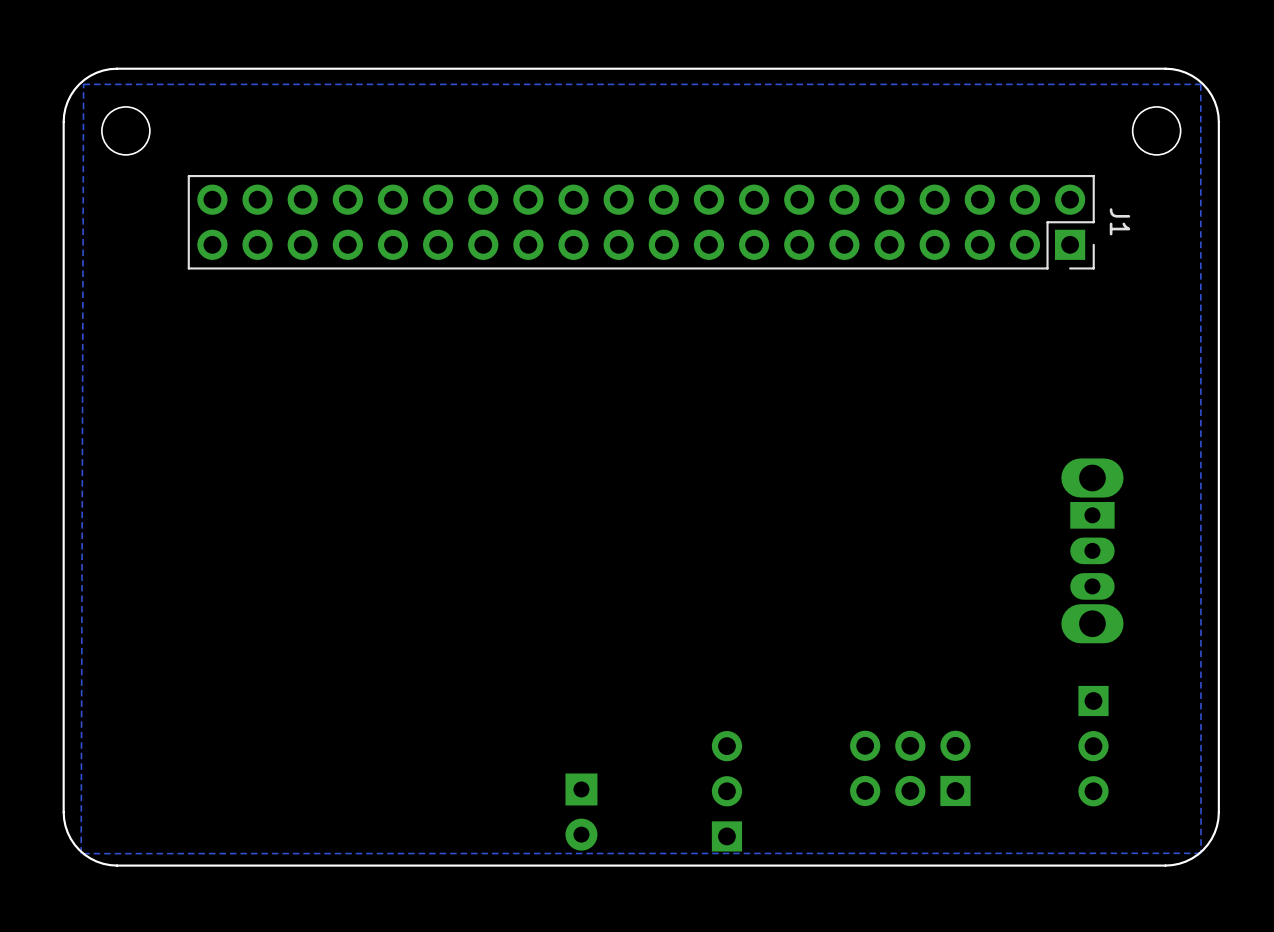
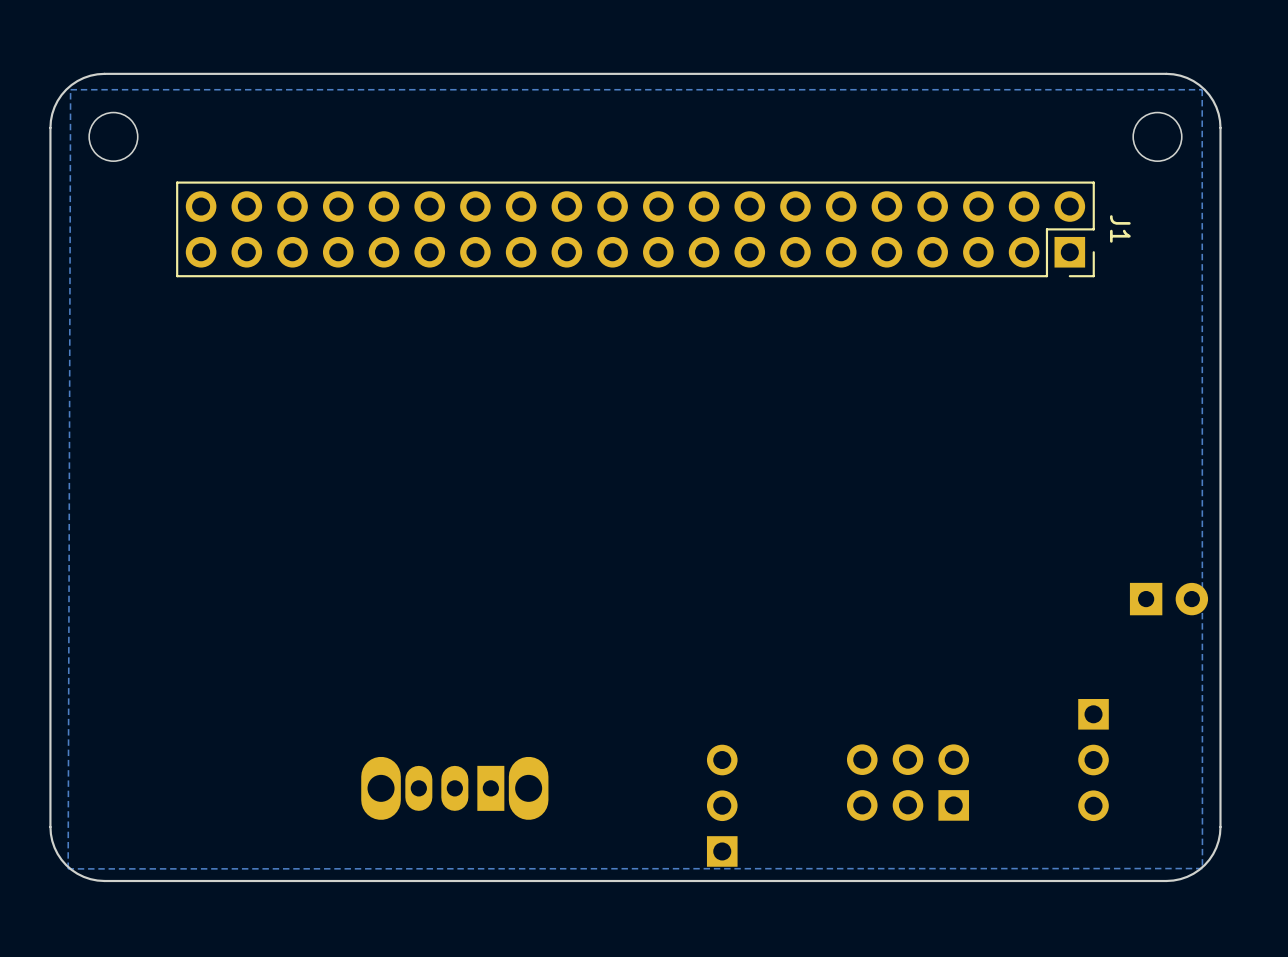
part: (1092, 550) -> none
part: none -> (1168, 599)
part: none -> (454, 788)
part: (581, 812) -> none

